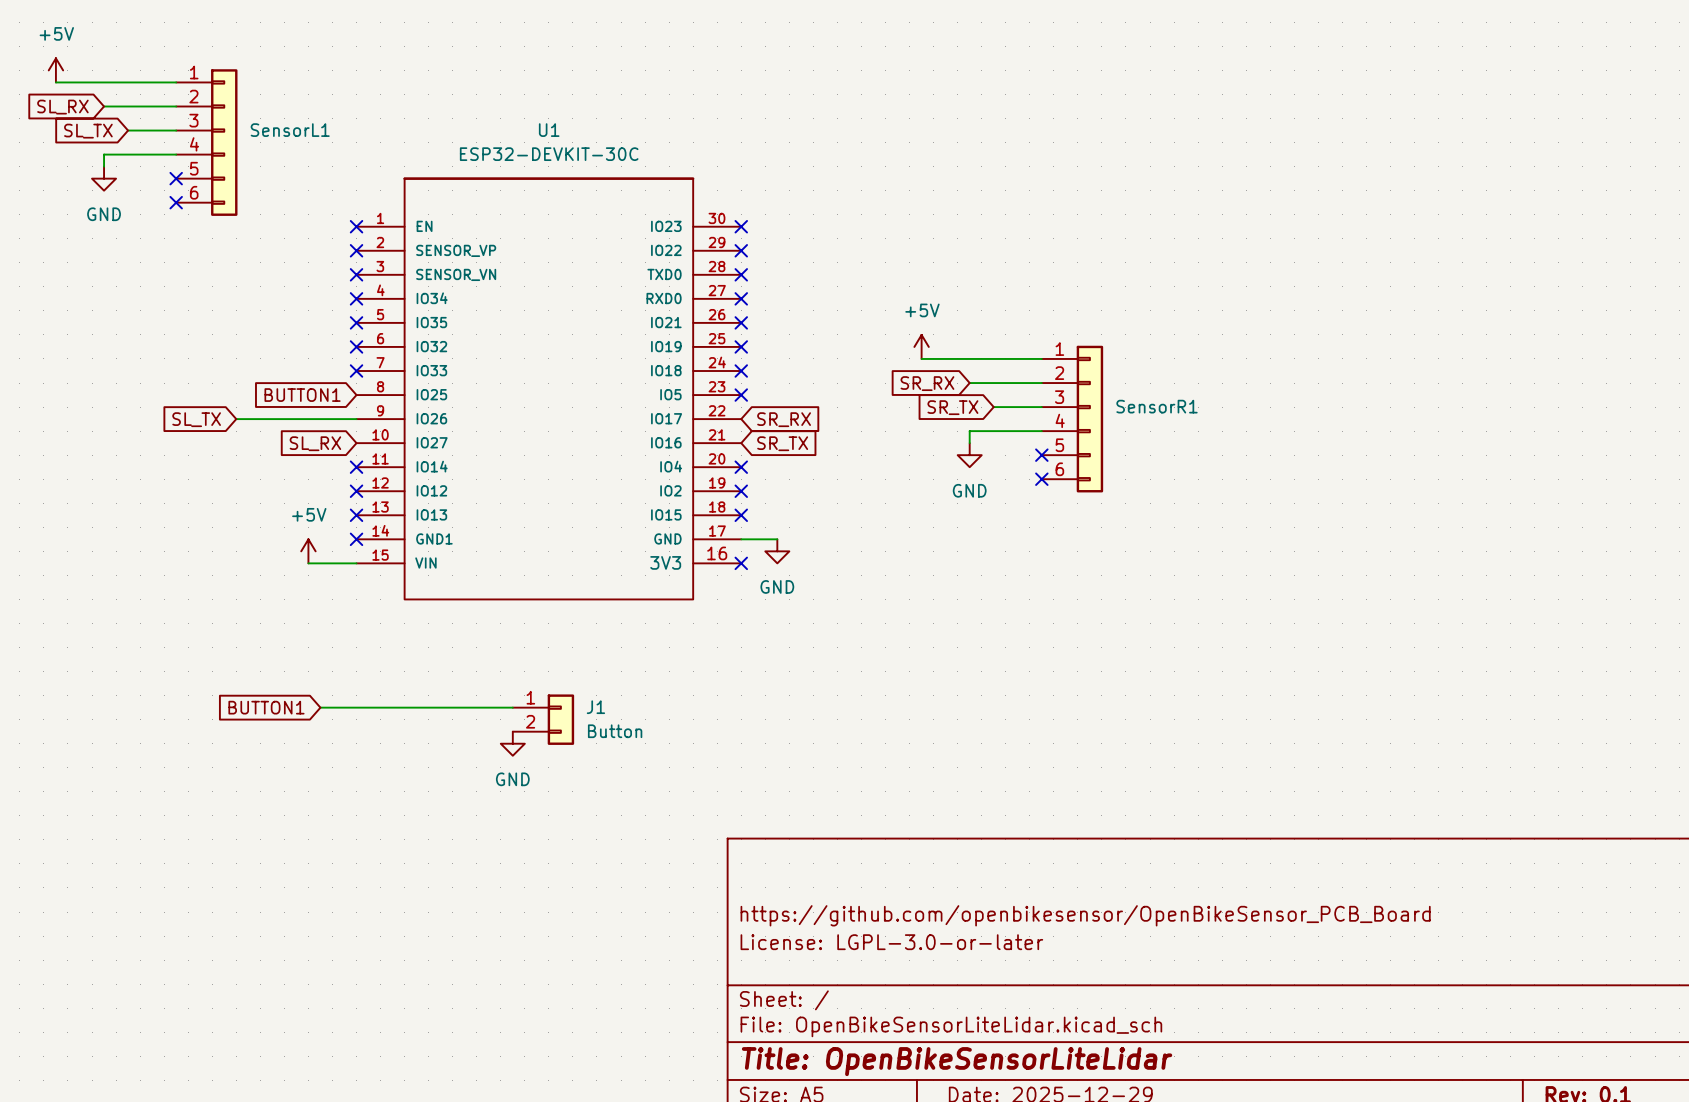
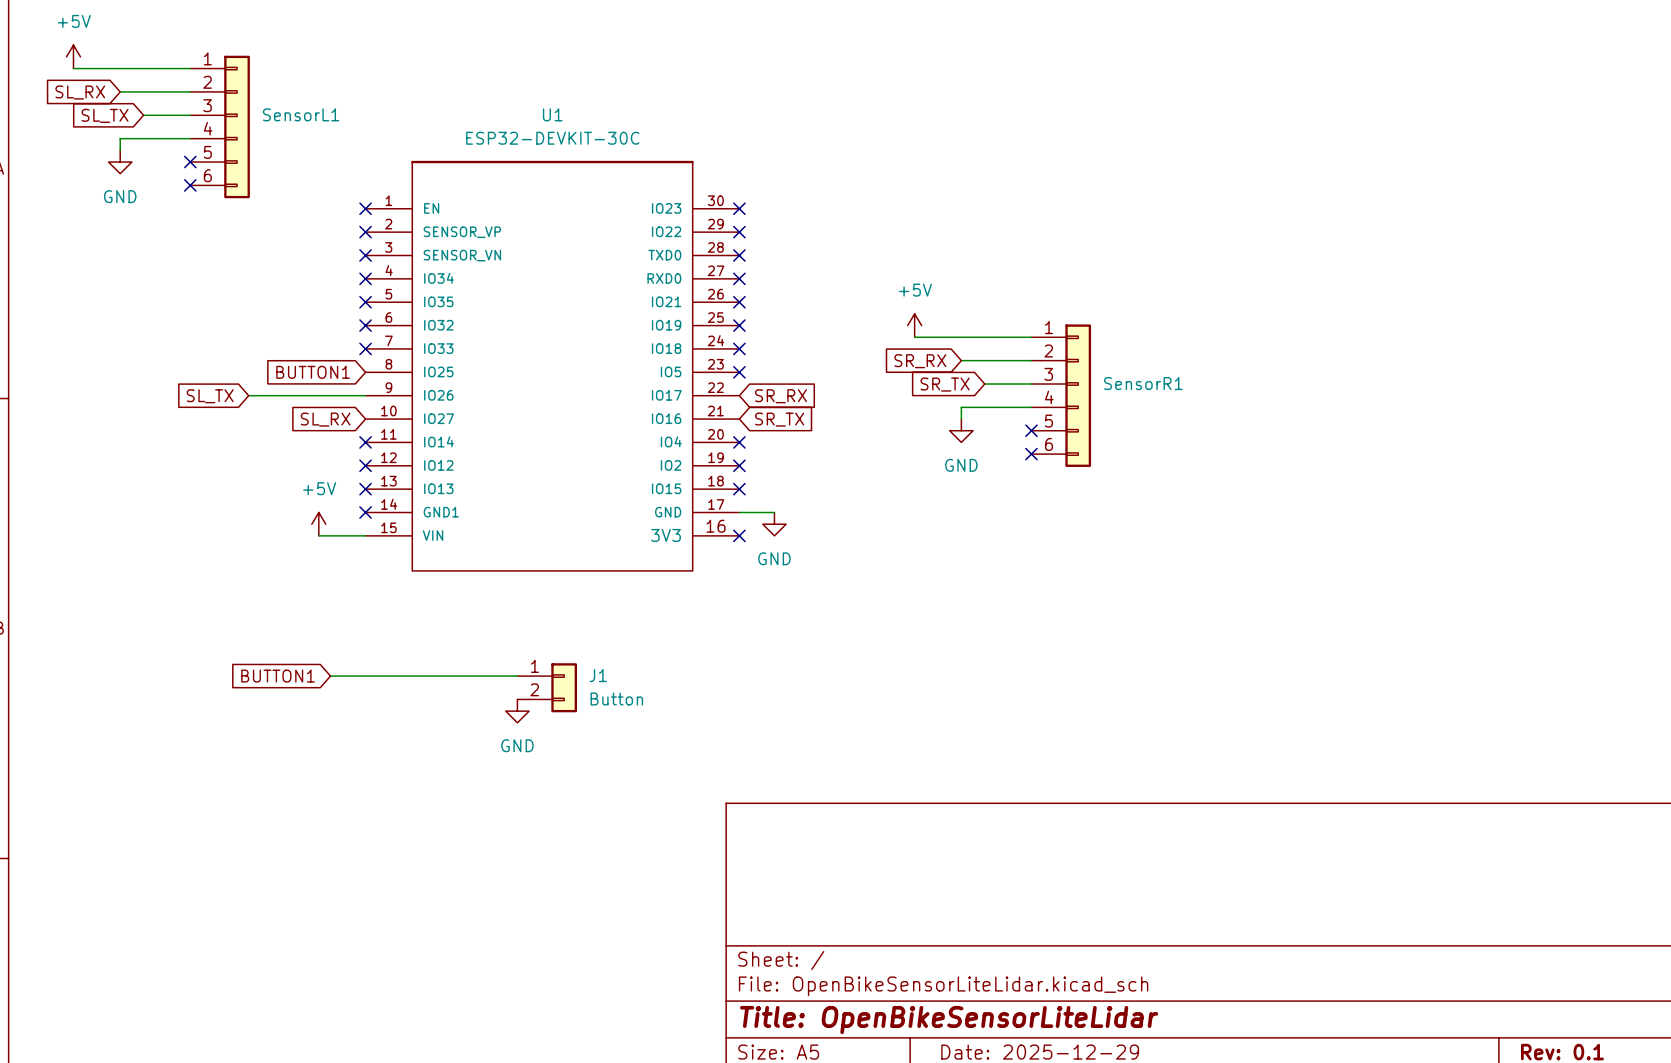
title block: https://github.com/openbikesensor/OpenBikeSensor_PCB_Board (1085, 915) -> none
title block: License: LGPL-3.0-or-later (891, 942) -> none

